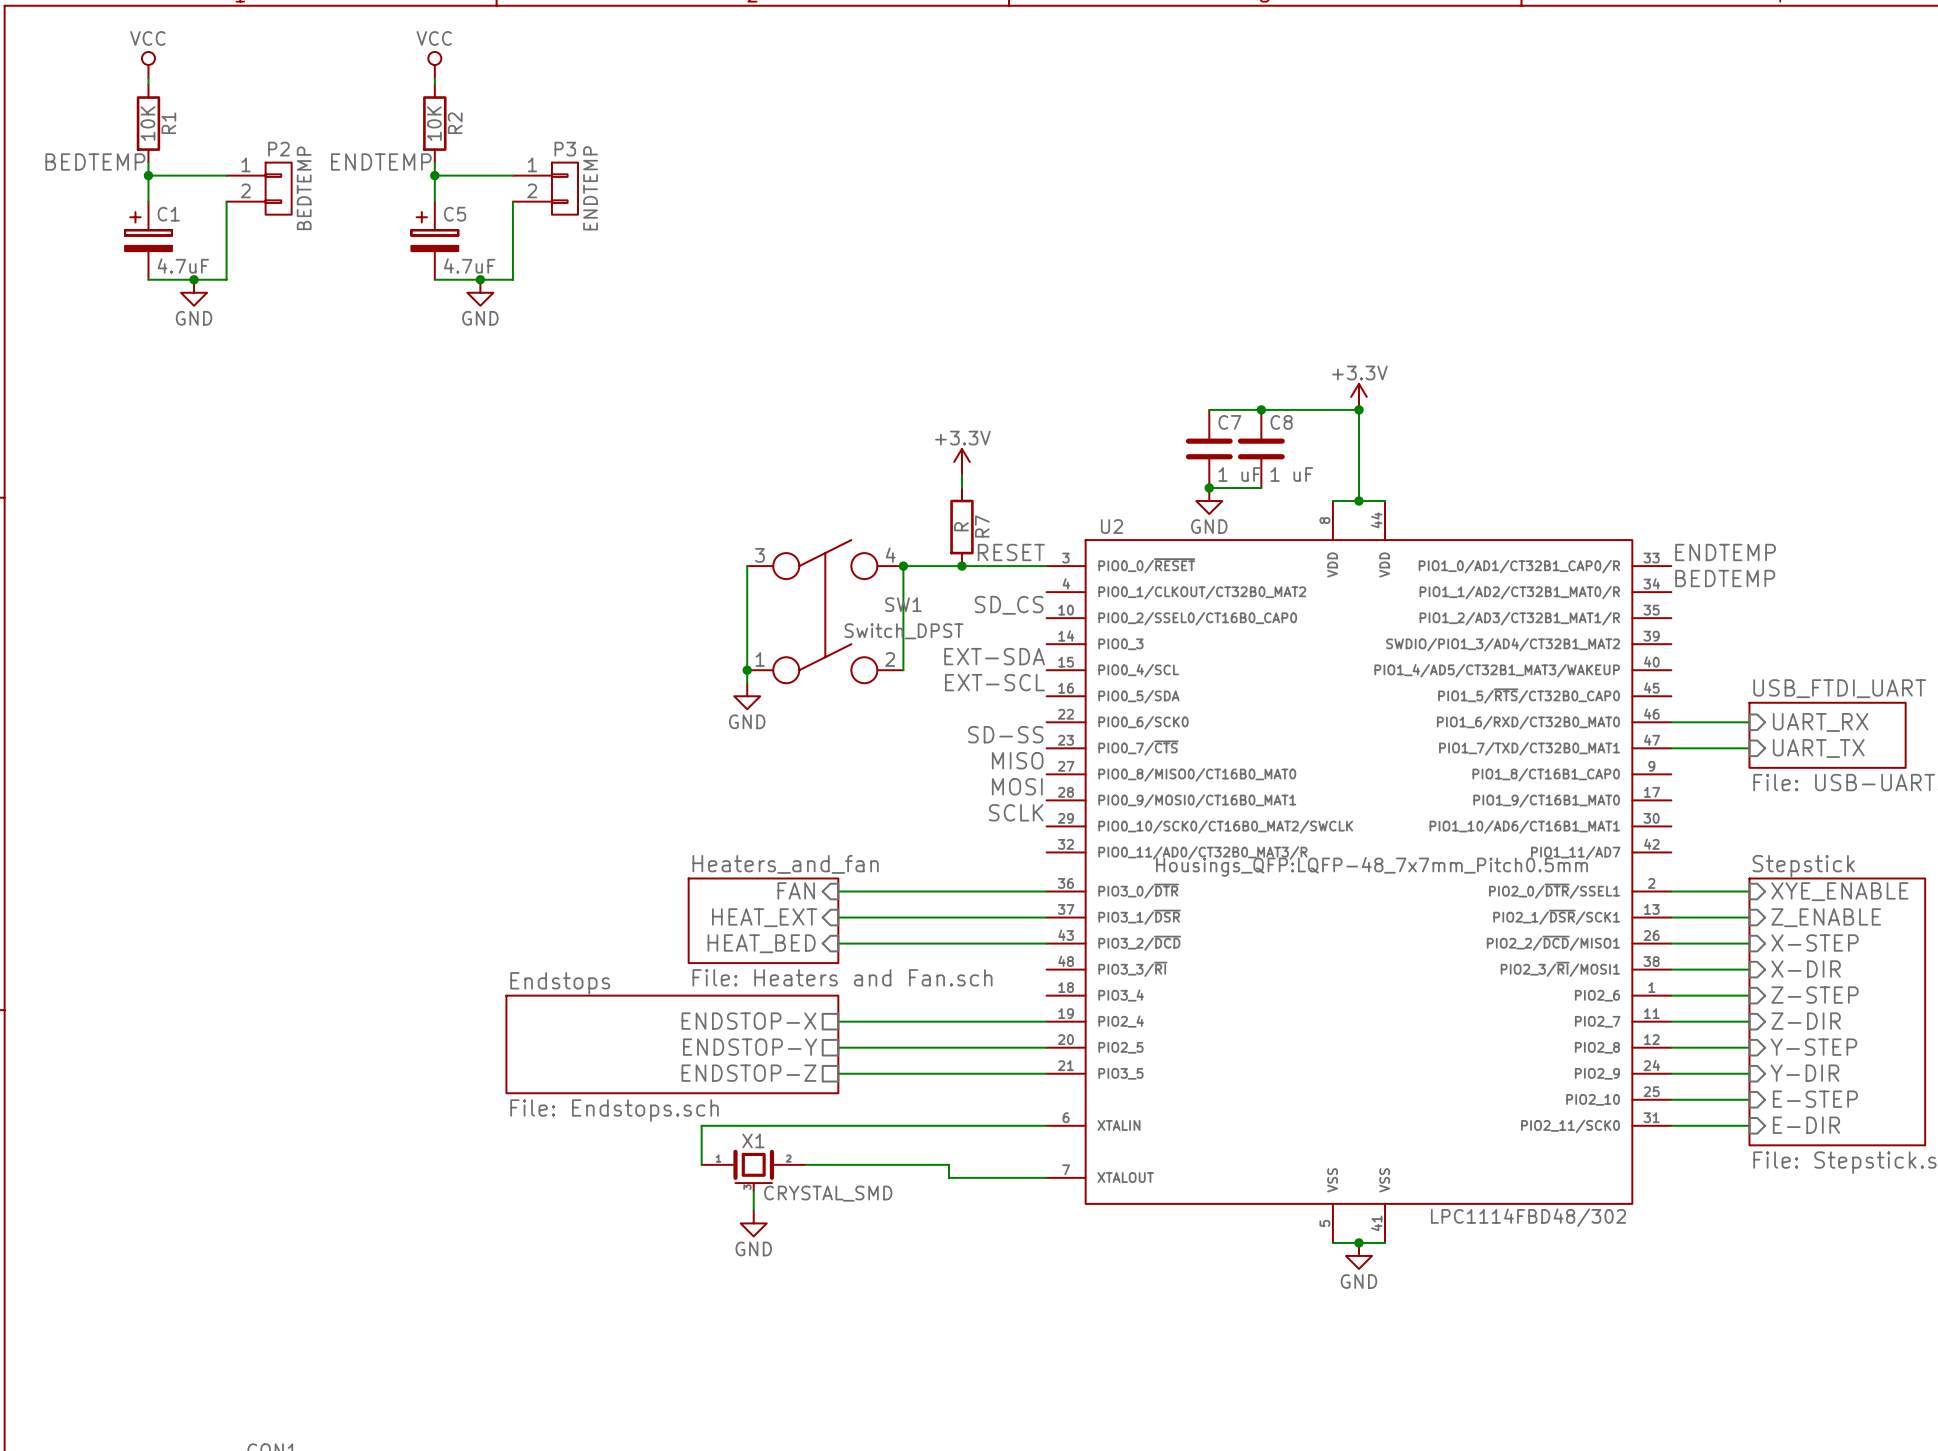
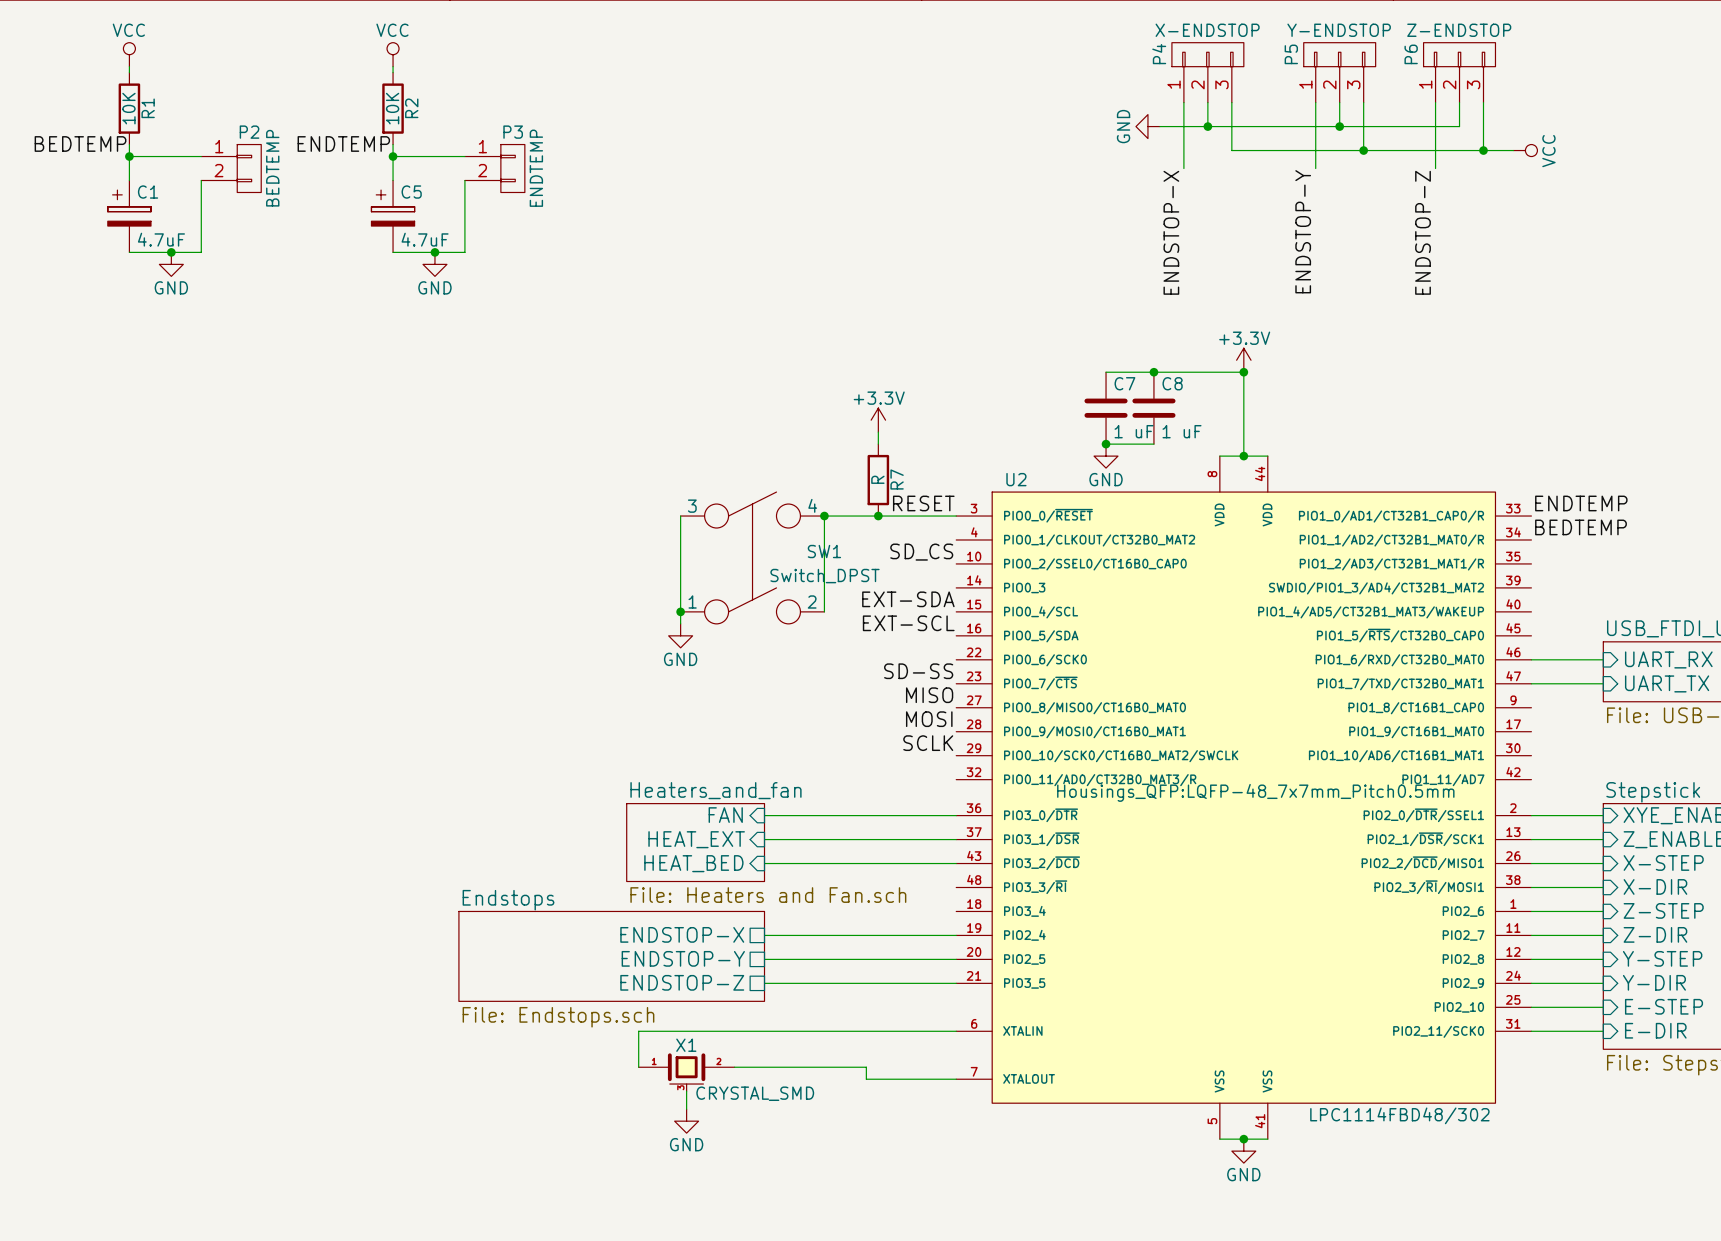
P4: none -> X-ENDSTOP (1207, 72)
P5: none -> Y-ENDSTOP (1339, 72)
P6: none -> Z-ENDSTOP (1459, 72)
wire: none -> (1183, 102) (1183, 168)
wire: none -> (1207, 102) (1207, 126)
wire: none -> (1231, 102) (1231, 150) (1513, 150)
wire: none -> (1315, 102) (1315, 168)
wire: none -> (1339, 102) (1339, 126)
wire: none -> (1363, 102) (1363, 150)
wire: none -> (1435, 102) (1435, 168)
wire: none -> (1459, 102) (1459, 126) (1159, 126)
wire: none -> (1483, 102) (1483, 150)
power symbol: none -> GND (1147, 126)
junction: none -> (1207, 126)
junction: none -> (1339, 126)
junction: none -> (1363, 150)
junction: none -> (1483, 150)
power symbol: none -> VCC (1525, 150)
label: none -> ENDSTOP-Y (1303, 231)
label: none -> ENDSTOP-X (1171, 232)
label: none -> ENDSTOP-Z (1423, 232)

